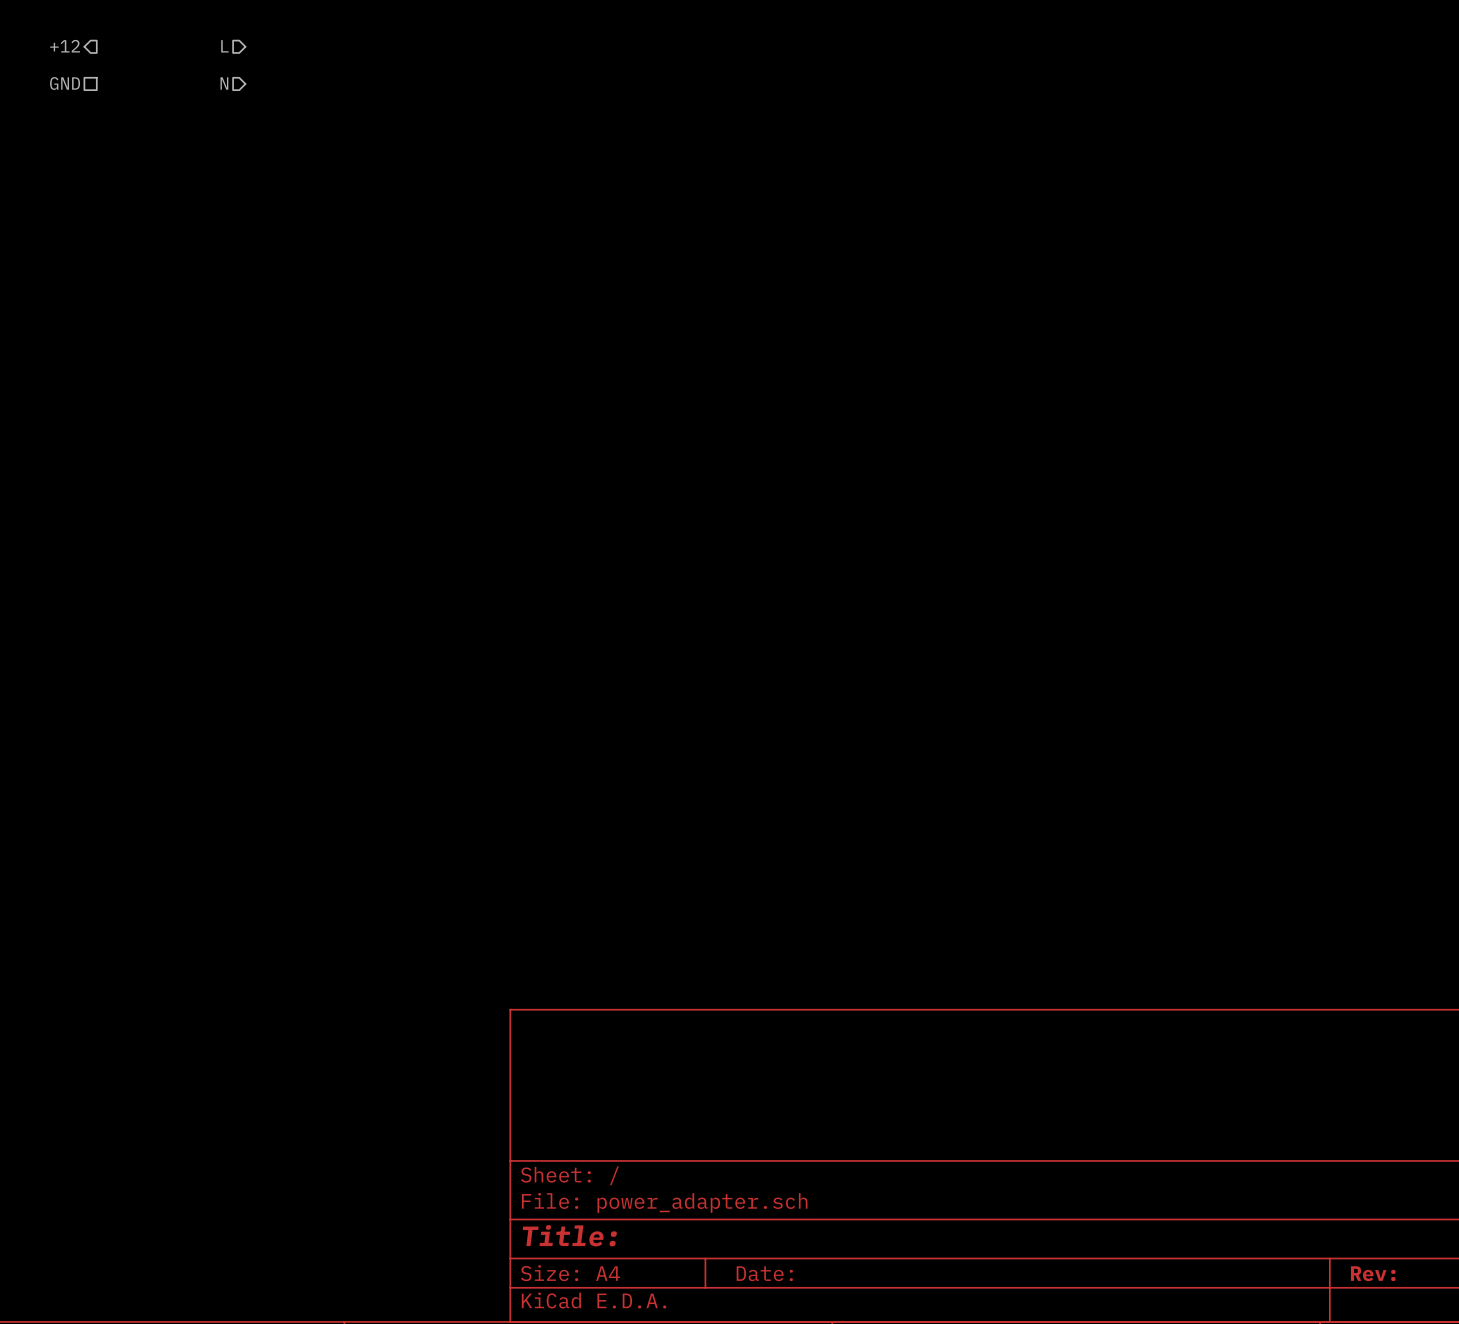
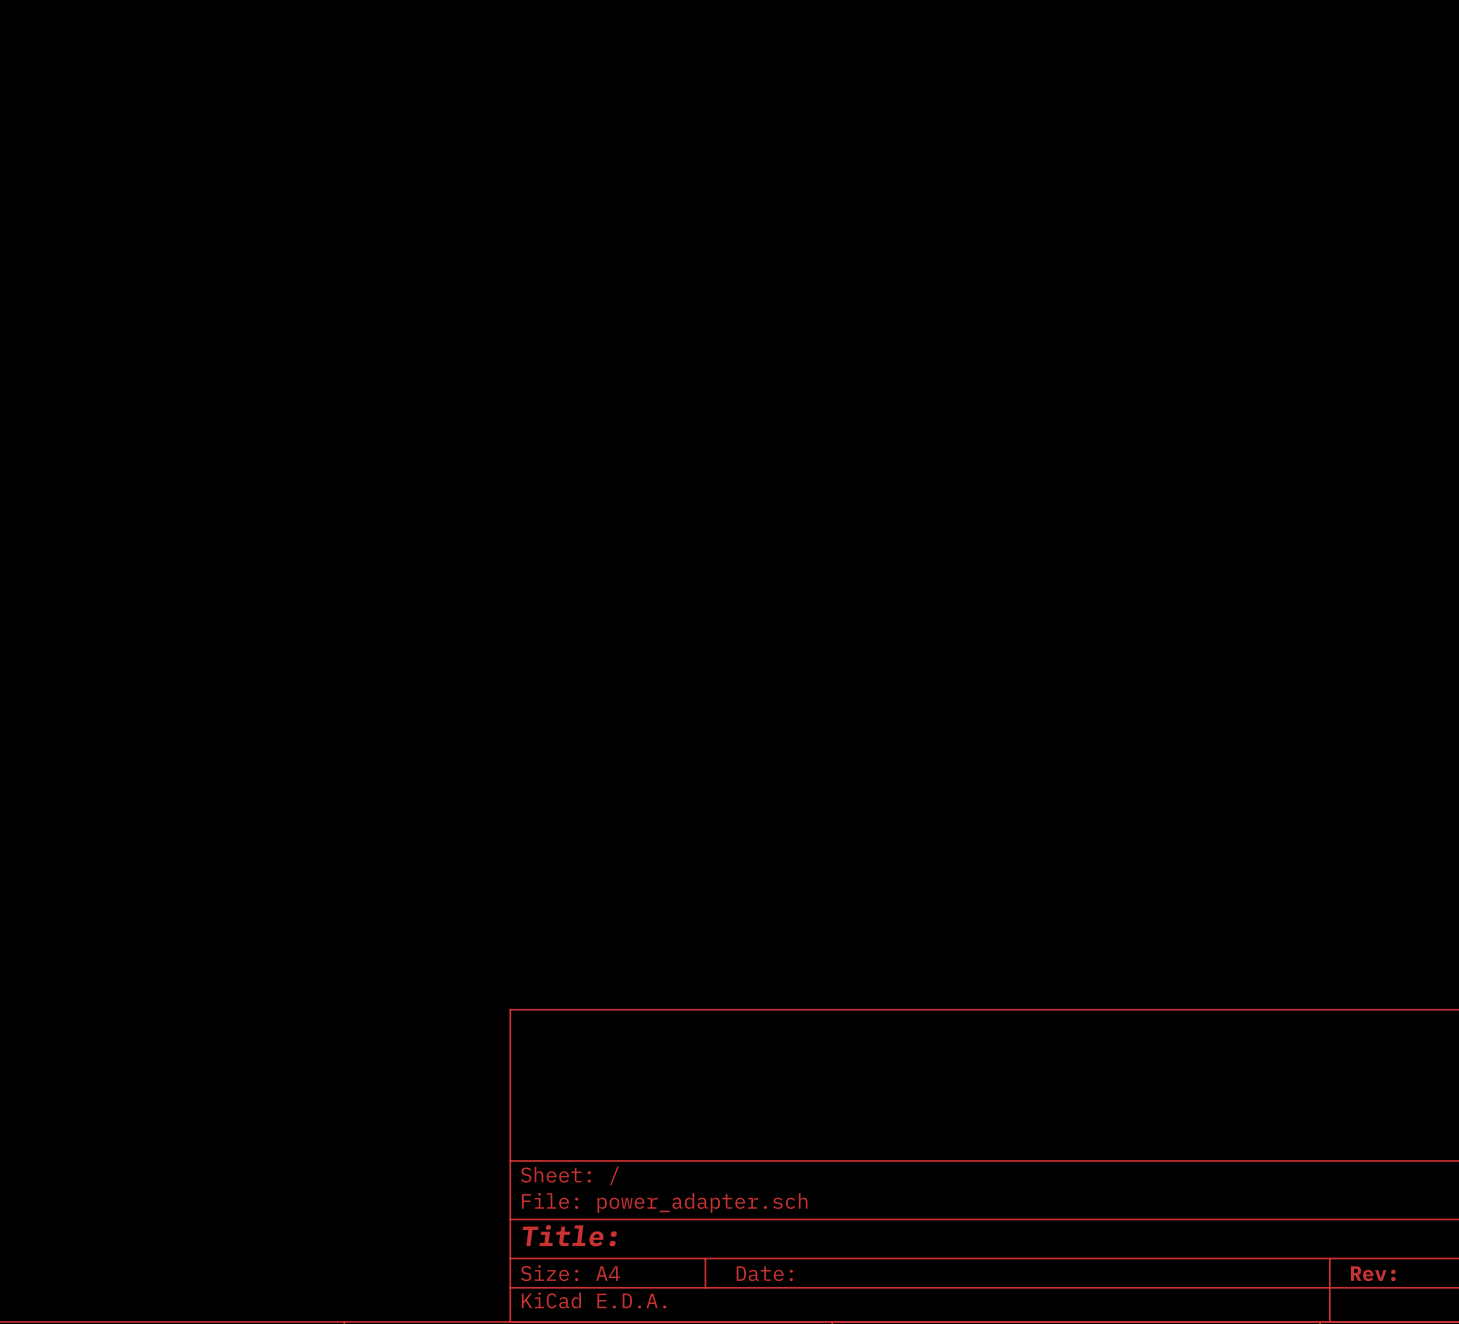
hierarchical label: +12 (65, 46) -> none
hierarchical label: L (224, 46) -> none
hierarchical label: GND (65, 83) -> none
hierarchical label: N (224, 83) -> none

